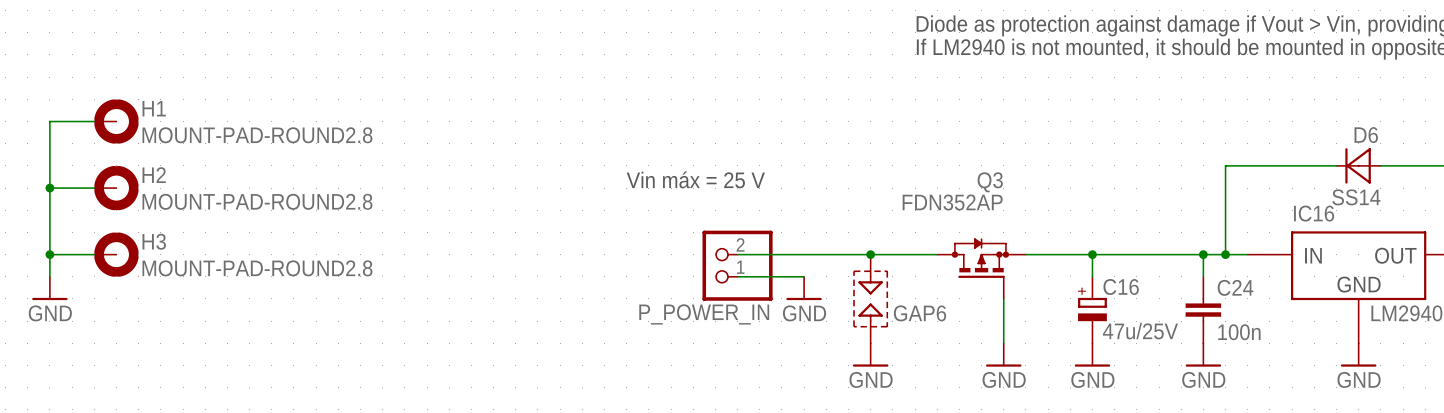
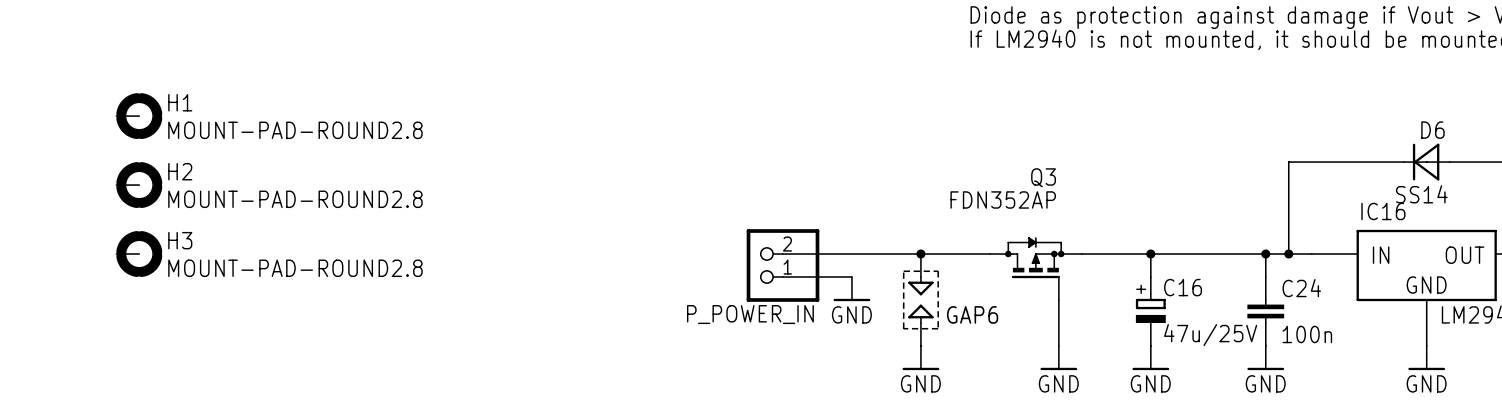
wire: (94, 121) (49, 121) (49, 276) -> none
text: Vin máx = 25 V (695, 179) -> none
wire: (49, 188) (94, 188) -> none
junction: (49, 188) -> none
wire: (49, 254) (94, 254) -> none
junction: (49, 254) -> none
power symbol: GND (49, 288) -> none

